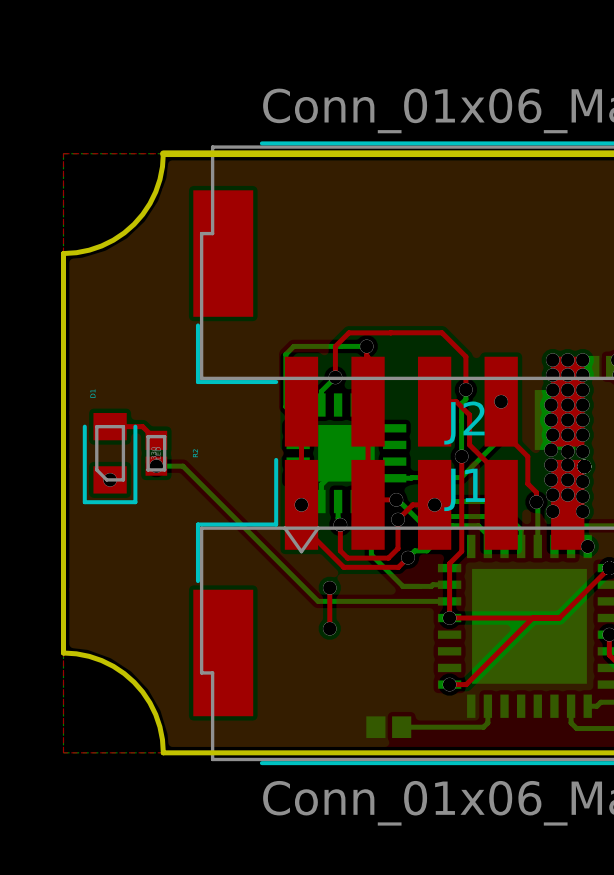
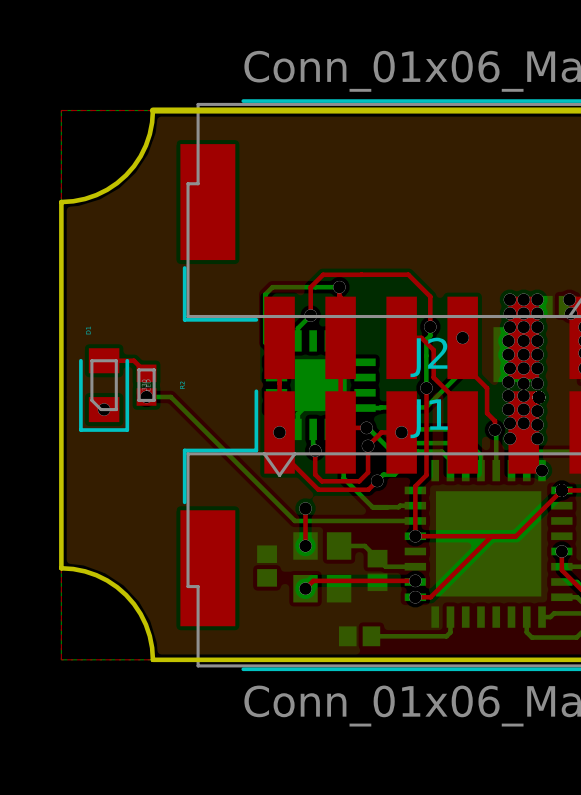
bottom track: none -> (339, 545) (364, 545) (385, 566) (415, 566)
part: none -> (267, 566)
part: none -> (322, 567)
part: none -> (377, 570)
top track: none -> (415, 580) (313, 580) (305, 588)
via: none -> (415, 580)
via: none -> (305, 588)

